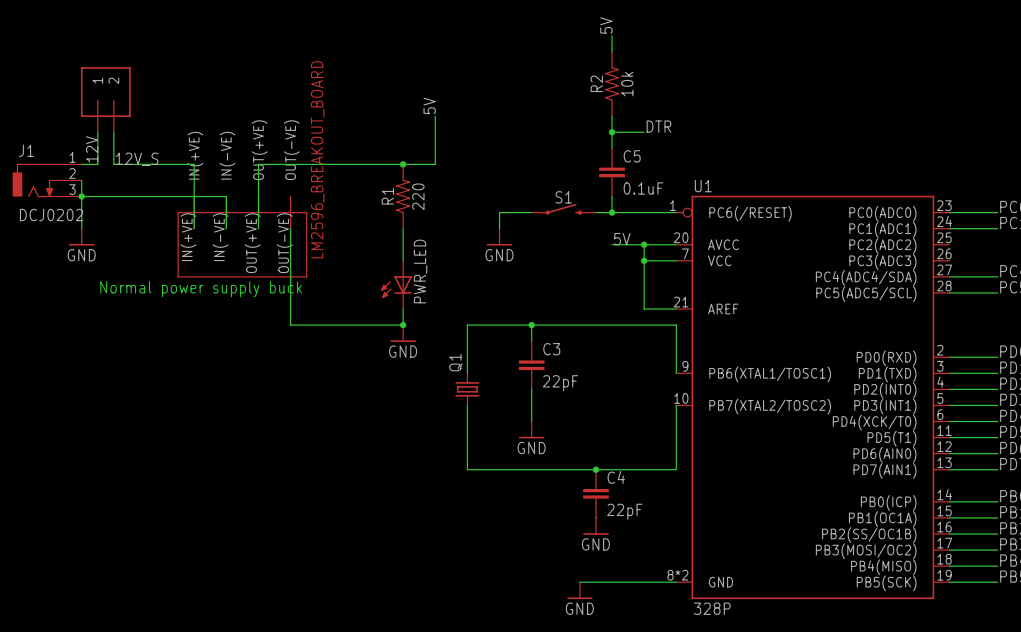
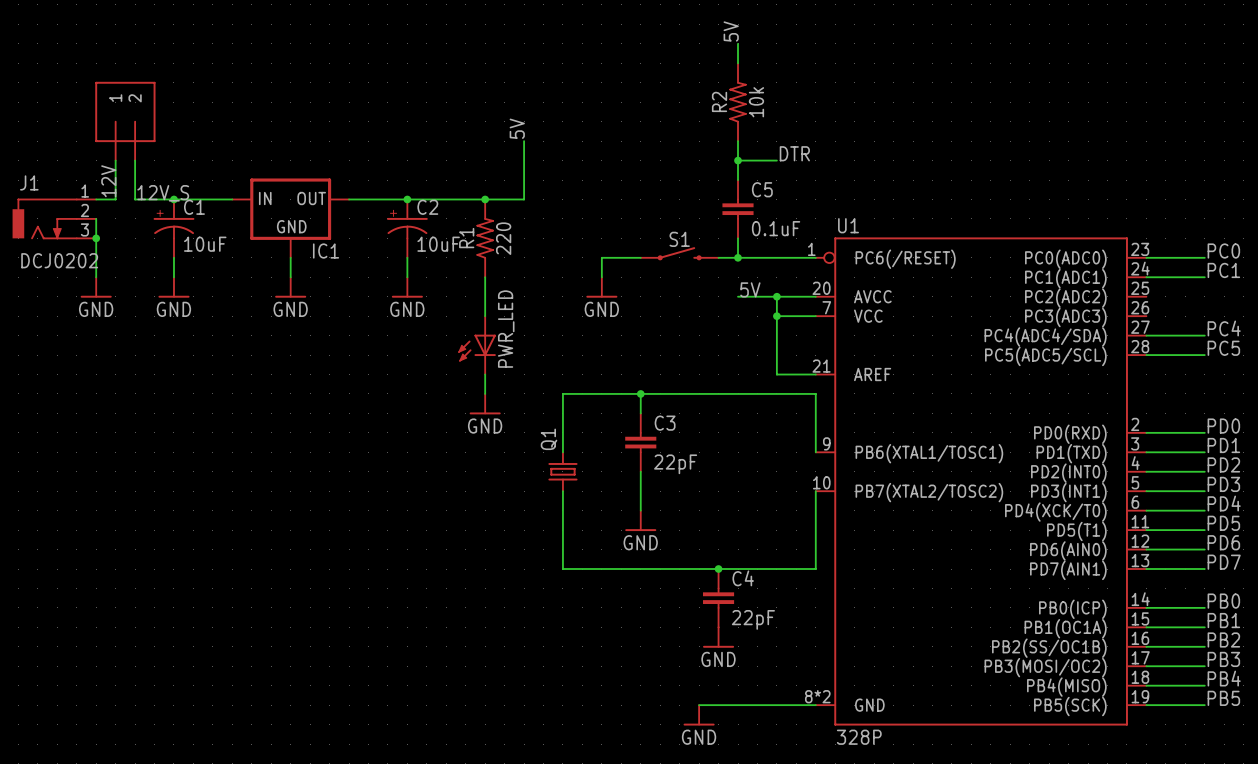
junction: none -> (173, 199)
wire: (194, 164) (194, 228) -> none
wire: (290, 164) (258, 164) (258, 228) -> none
junction: none -> (407, 199)
IC1: none -> (290, 218)
C1: none -> 10uF (173, 228)
C2: none -> 10uF (407, 228)
wire: (81, 196) (226, 196) (226, 228) -> none
wire: none -> (173, 257) (173, 277)
wire: none -> (290, 257) (290, 277)
wire: none -> (407, 257) (407, 277)
wire: (290, 228) (290, 325) (403, 325) -> none
part: (242, 236) -> none
power symbol: none -> GND (173, 287)
power symbol: none -> GND (290, 287)
power symbol: none -> GND (407, 287)
text: Normal power supply buck (201, 289) -> none
junction: (403, 325) -> none

